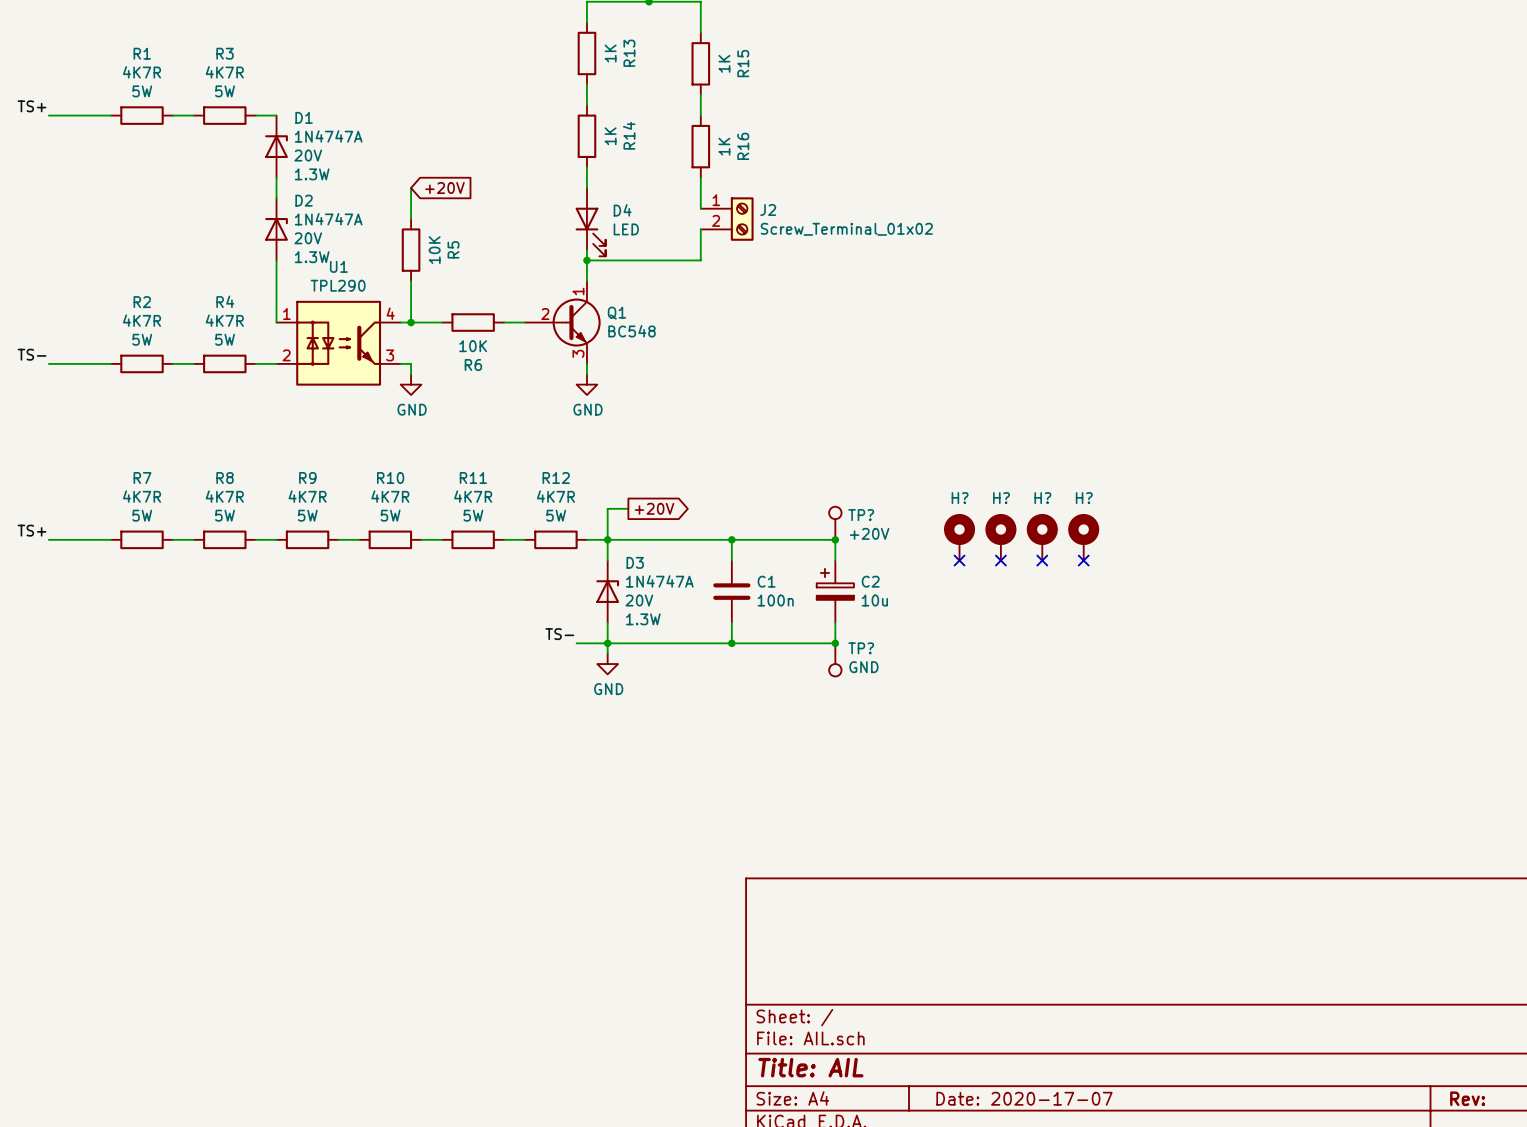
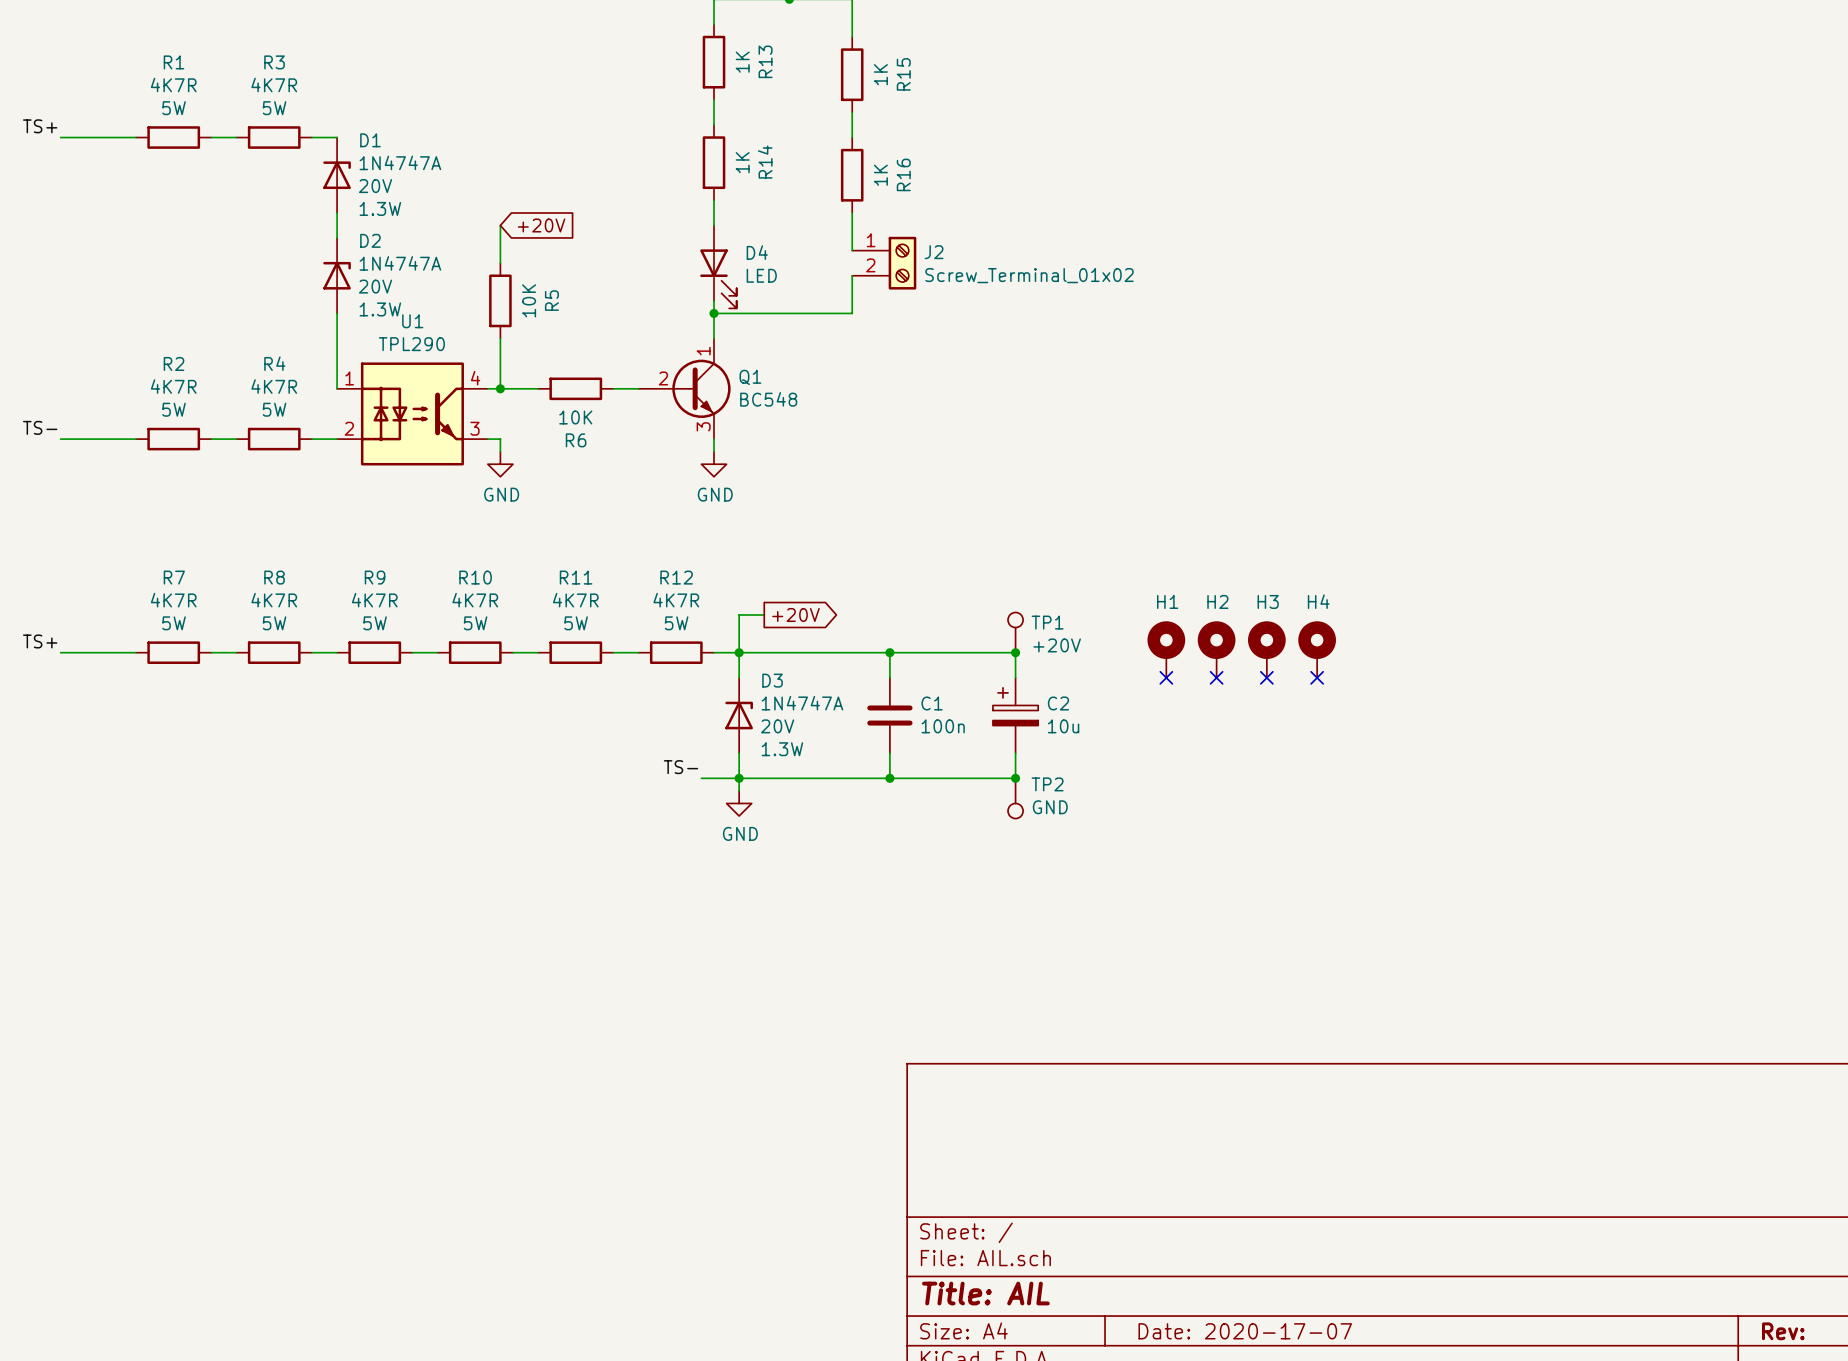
H? name: H? (960, 498) -> H1 (1167, 601)
H? name: H? (1001, 498) -> H2 (1217, 601)
H? name: H? (1042, 498) -> H3 (1268, 601)
H? name: H? (1084, 498) -> H4 (1318, 601)
TP? name: TP? (861, 515) -> TP1 (1047, 622)
TP? name: TP? (861, 648) -> TP2 (1047, 784)

